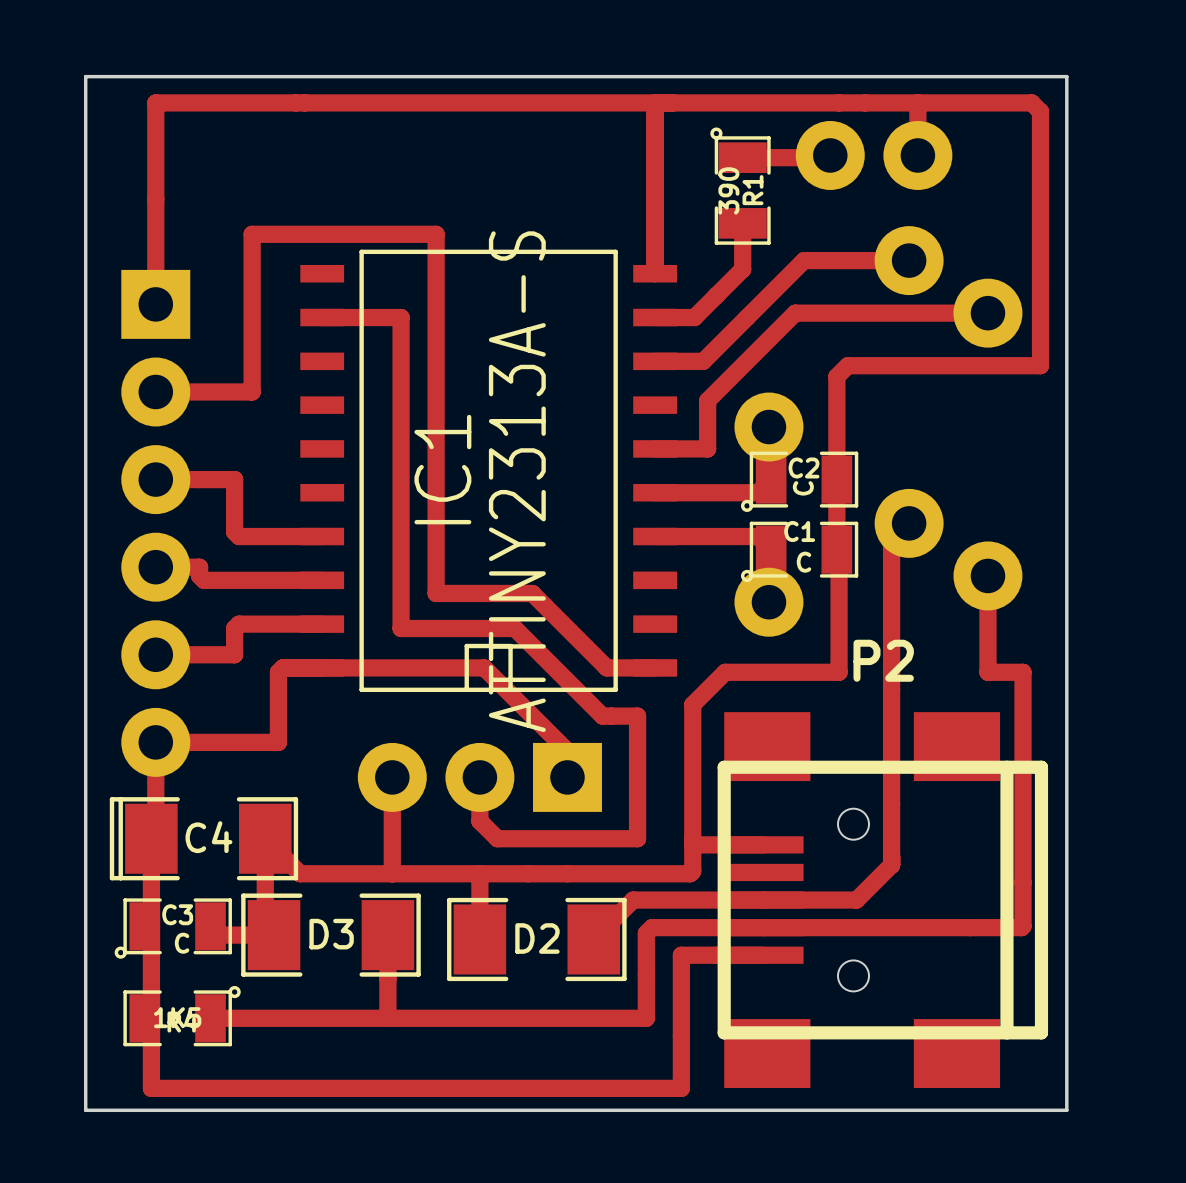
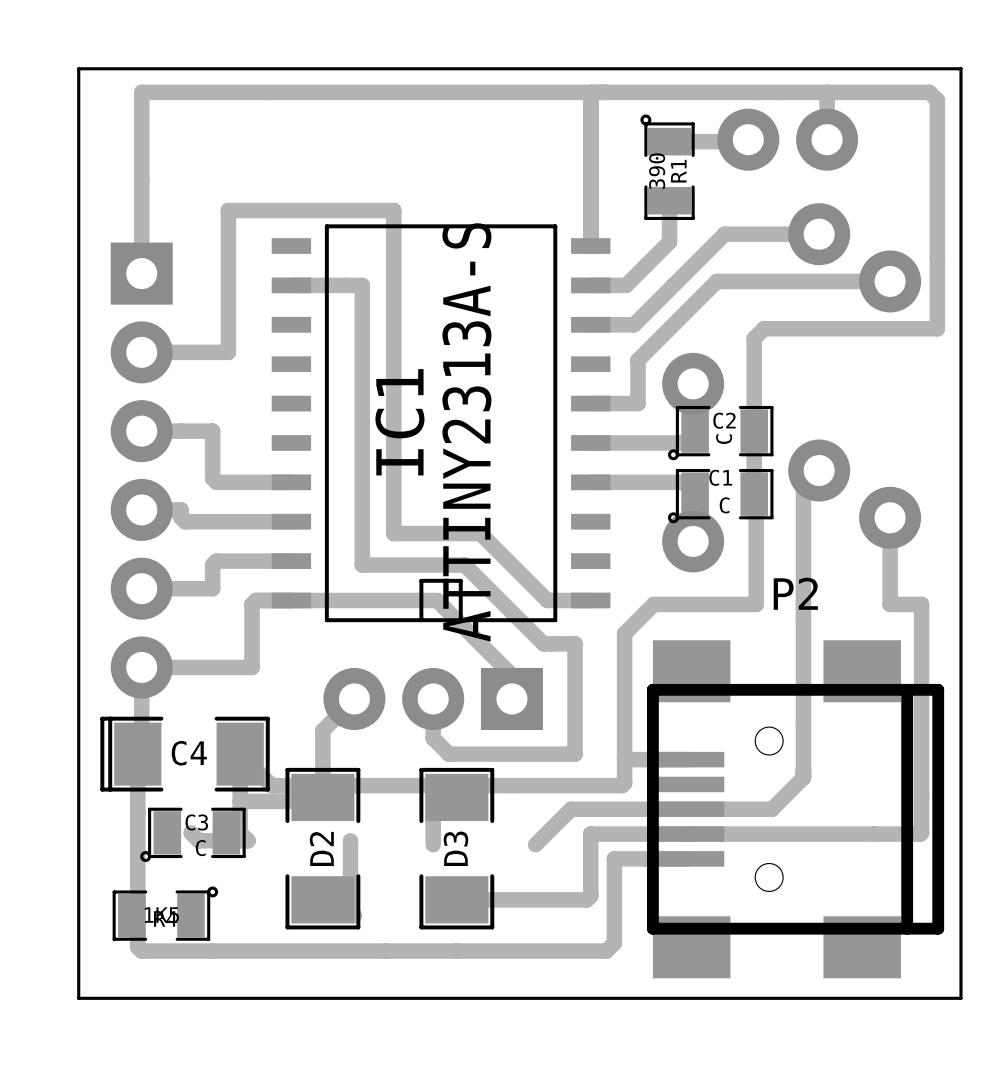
track: (392, 777) (392, 873) -> (354, 698) (322, 730) (322, 797) (318, 801) (240, 801)
track: (655, 927) (652, 927) (646, 933) (646, 1018) (210, 1018) -> (590, 834) (590, 895) (586, 899) (441, 899)
C3 position: (173, 928) -> (192, 834)
D3 rotation: 0° (330, 935) -> 90° clockwise (456, 848)
D3 position: (330, 935) -> (456, 848)
D2 rotation: 0° (536, 939) -> 90° clockwise (322, 848)
D2 position: (536, 939) -> (322, 848)
track: (681, 1048) (681, 1088) (151, 1088) (151, 1053) -> (614, 943) (606, 951) (141, 951) (137, 947)

